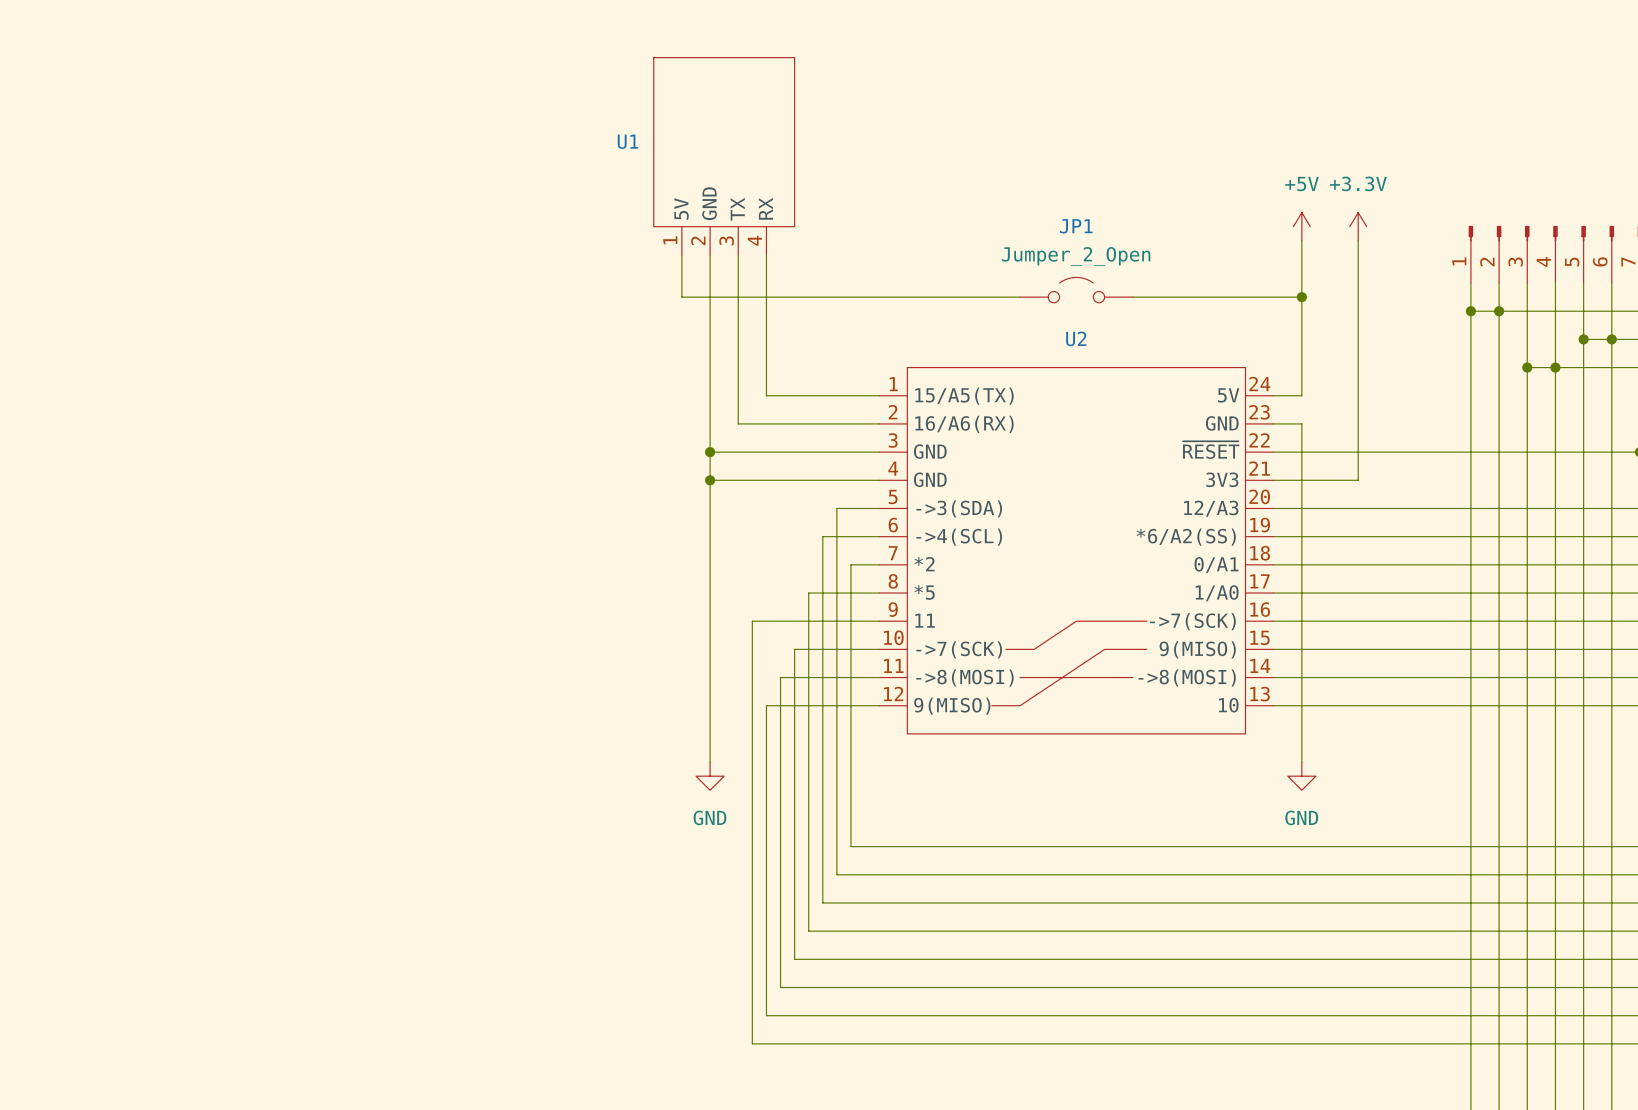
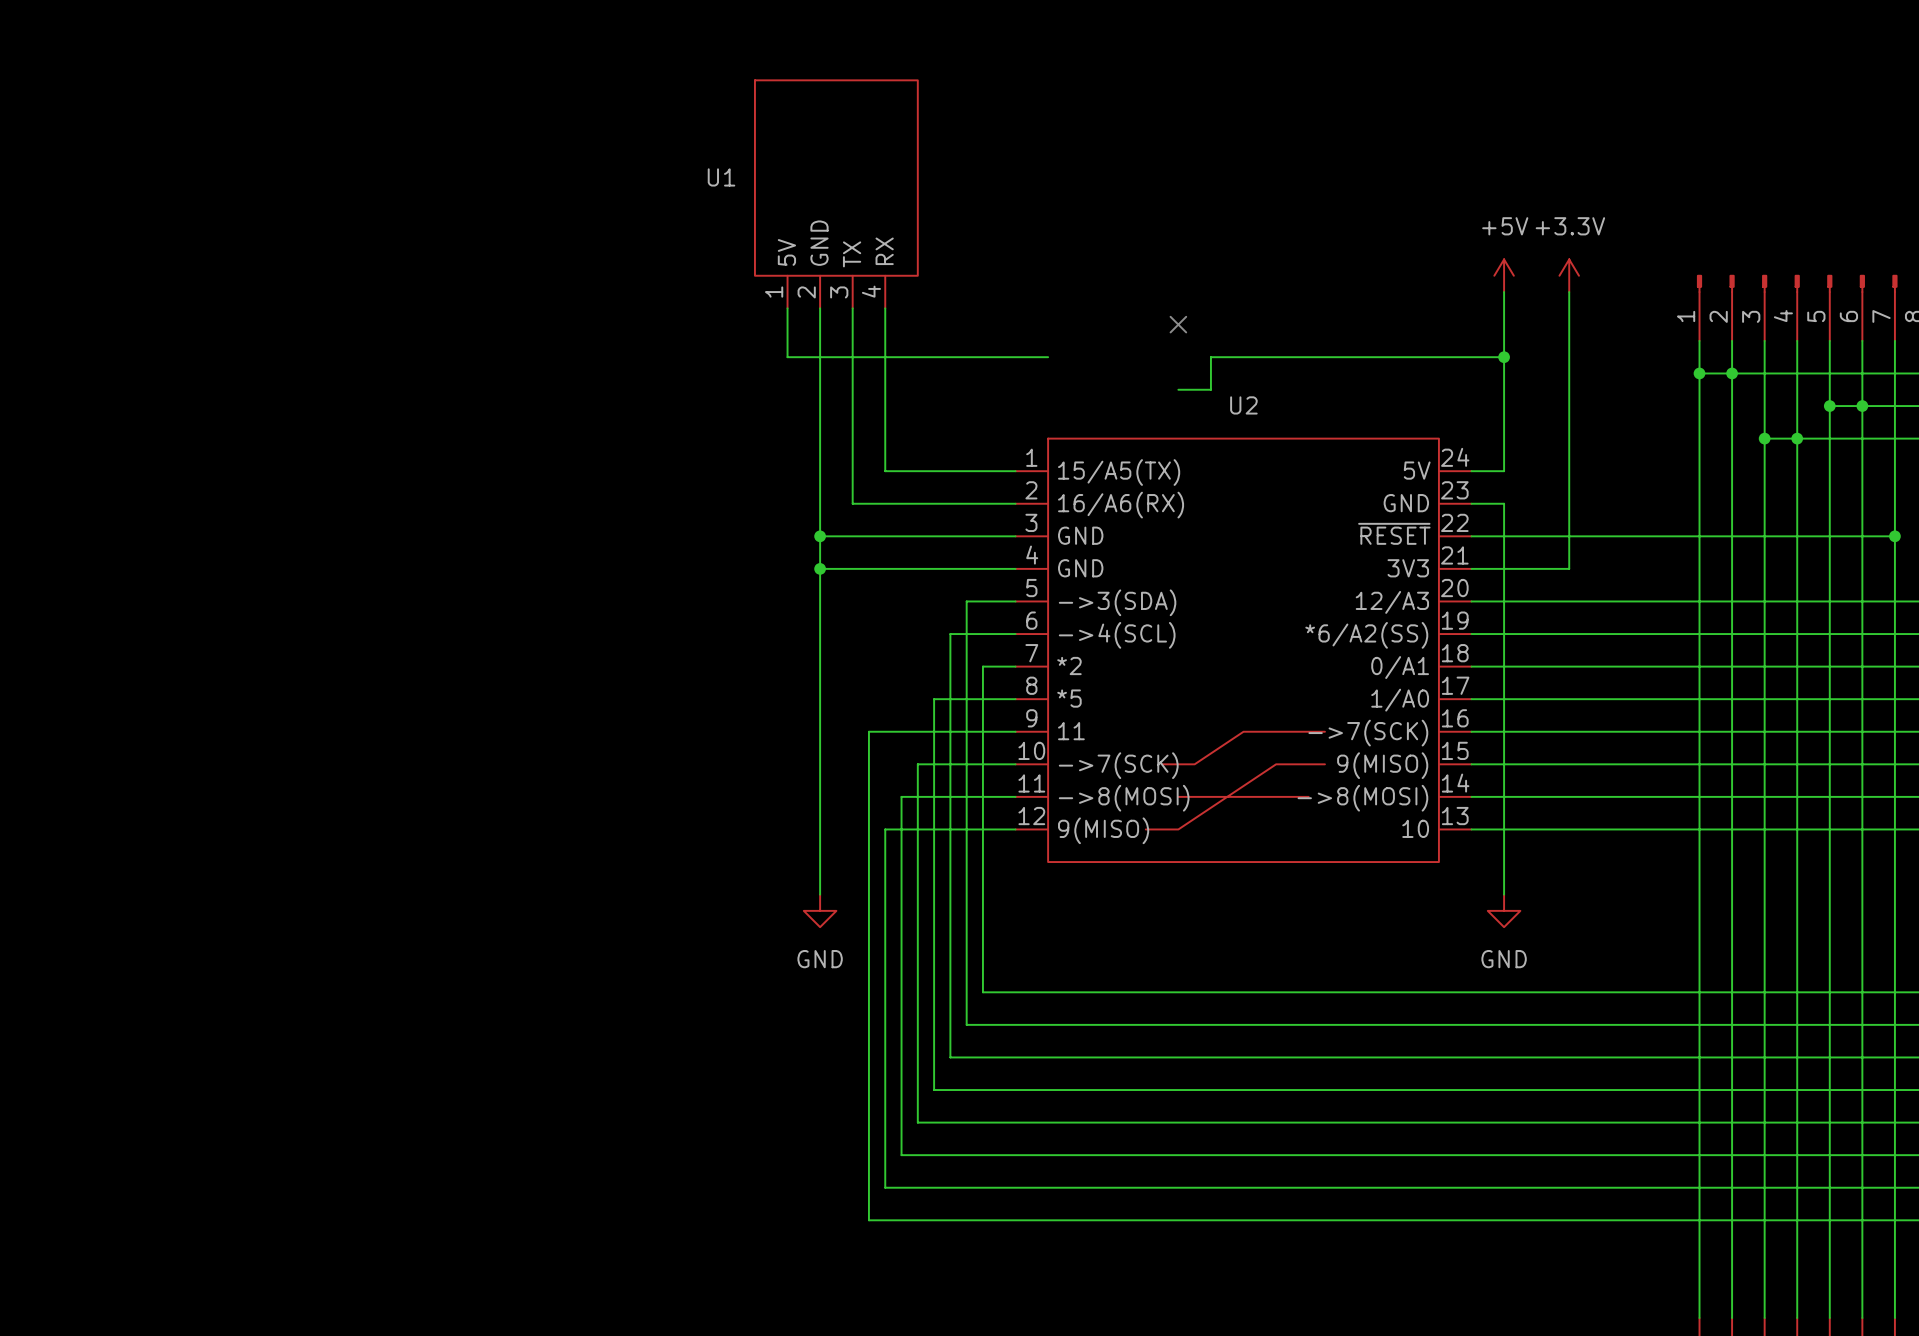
no-connect mark: none -> (1178, 324)
JP1: Jumper_2_Open (1076, 290) -> none
wire: (907, 297) (1020, 297) -> none
wire: none -> (1308, 357) (1210, 357) (1210, 389) (1178, 389)

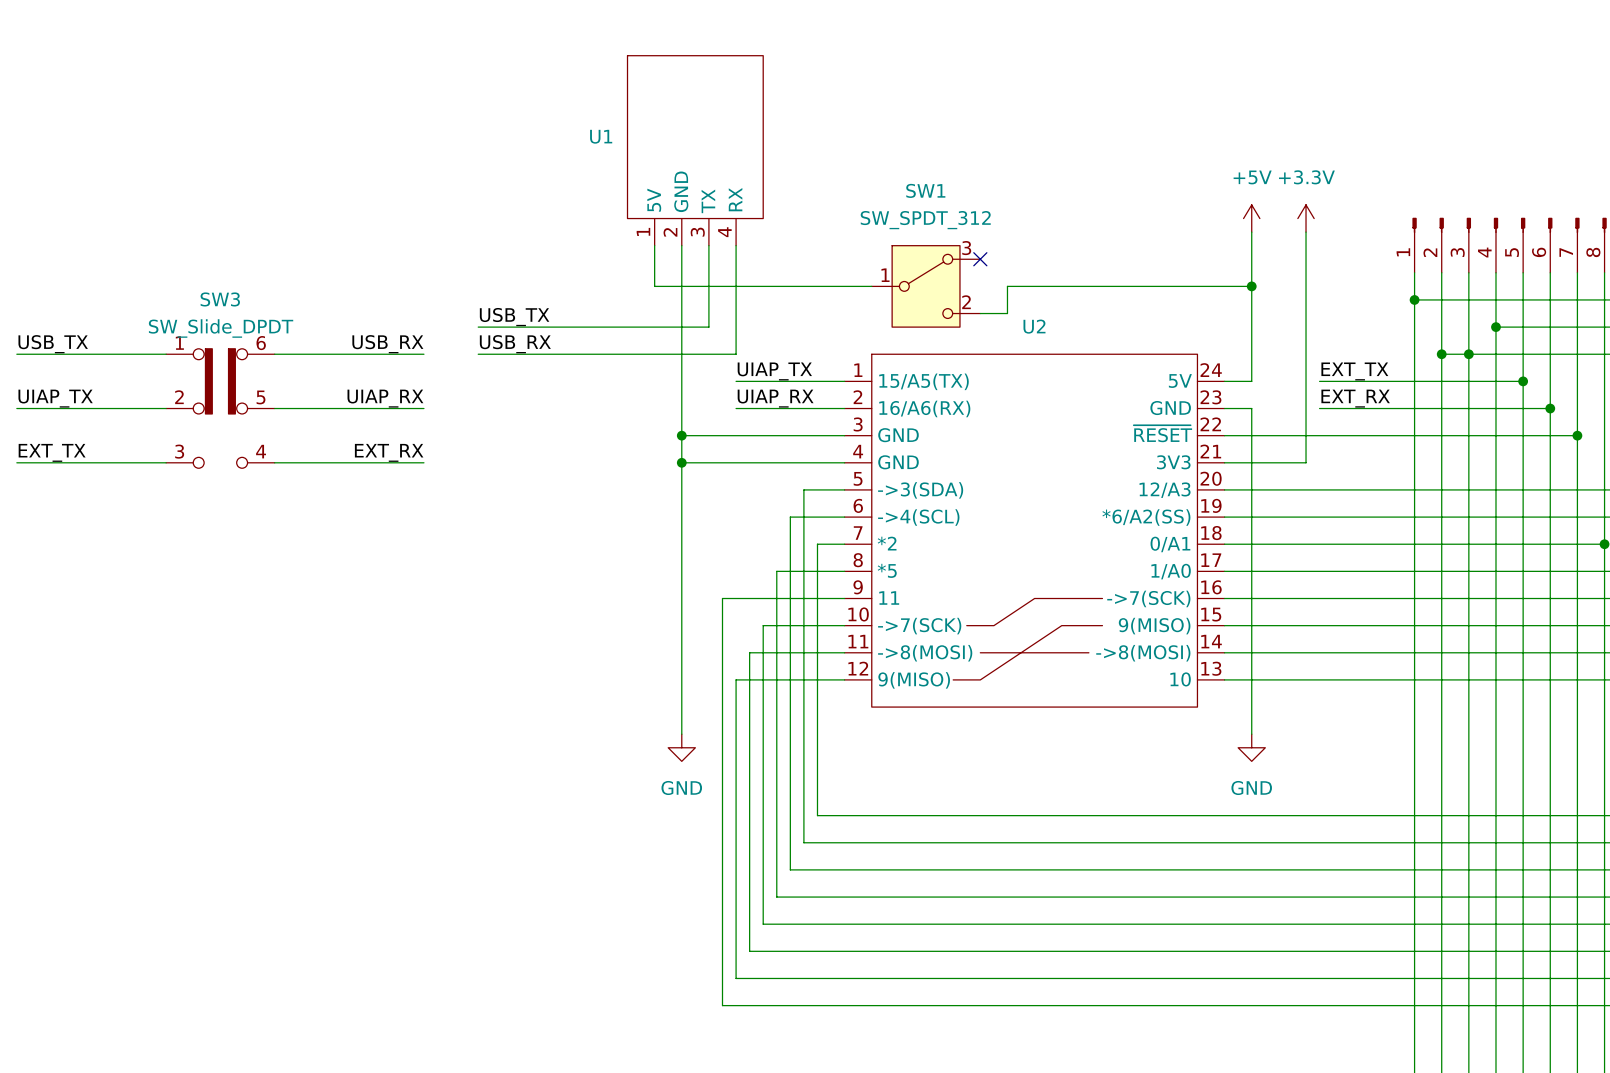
SW1: none -> SW_SPDT_312 (926, 286)
junction: (1732, 373) -> none
label: none -> USB_TX (514, 317)
wire: (852, 406) (852, 503) (885, 503) -> (708, 327) (478, 327)
wire: none -> (1495, 327) (1523, 327)
junction: none -> (1495, 327)
junction: (1829, 406) -> none
junction: (1862, 406) -> none
label: none -> USB_TX (53, 344)
label: none -> USB_RX (387, 344)
label: none -> USB_RX (515, 344)
wire: none -> (16, 354) (166, 354)
wire: none -> (274, 354) (423, 354)
wire: (885, 438) (885, 471) -> (736, 354) (478, 354)
wire: none -> (1441, 354) (1468, 354)
junction: none -> (1441, 354)
junction: (1797, 438) -> none
label: none -> UIAP_TX (774, 371)
label: none -> EXT_TX (1354, 371)
wire: none -> (1319, 381) (1523, 381)
junction: none -> (1523, 381)
label: none -> UIAP_TX (55, 398)
label: none -> UIAP_RX (385, 398)
label: none -> UIAP_RX (775, 398)
label: none -> EXT_RX (1355, 398)
wire: none -> (16, 408) (166, 408)
SW3: none -> SW_Slide_DPDT (220, 408)
wire: none -> (274, 408) (423, 408)
wire: none -> (1319, 408) (1550, 408)
junction: none -> (1550, 408)
label: none -> EXT_TX (52, 452)
label: none -> EXT_RX (389, 452)
wire: none -> (16, 462) (166, 462)
wire: none -> (274, 462) (423, 462)

